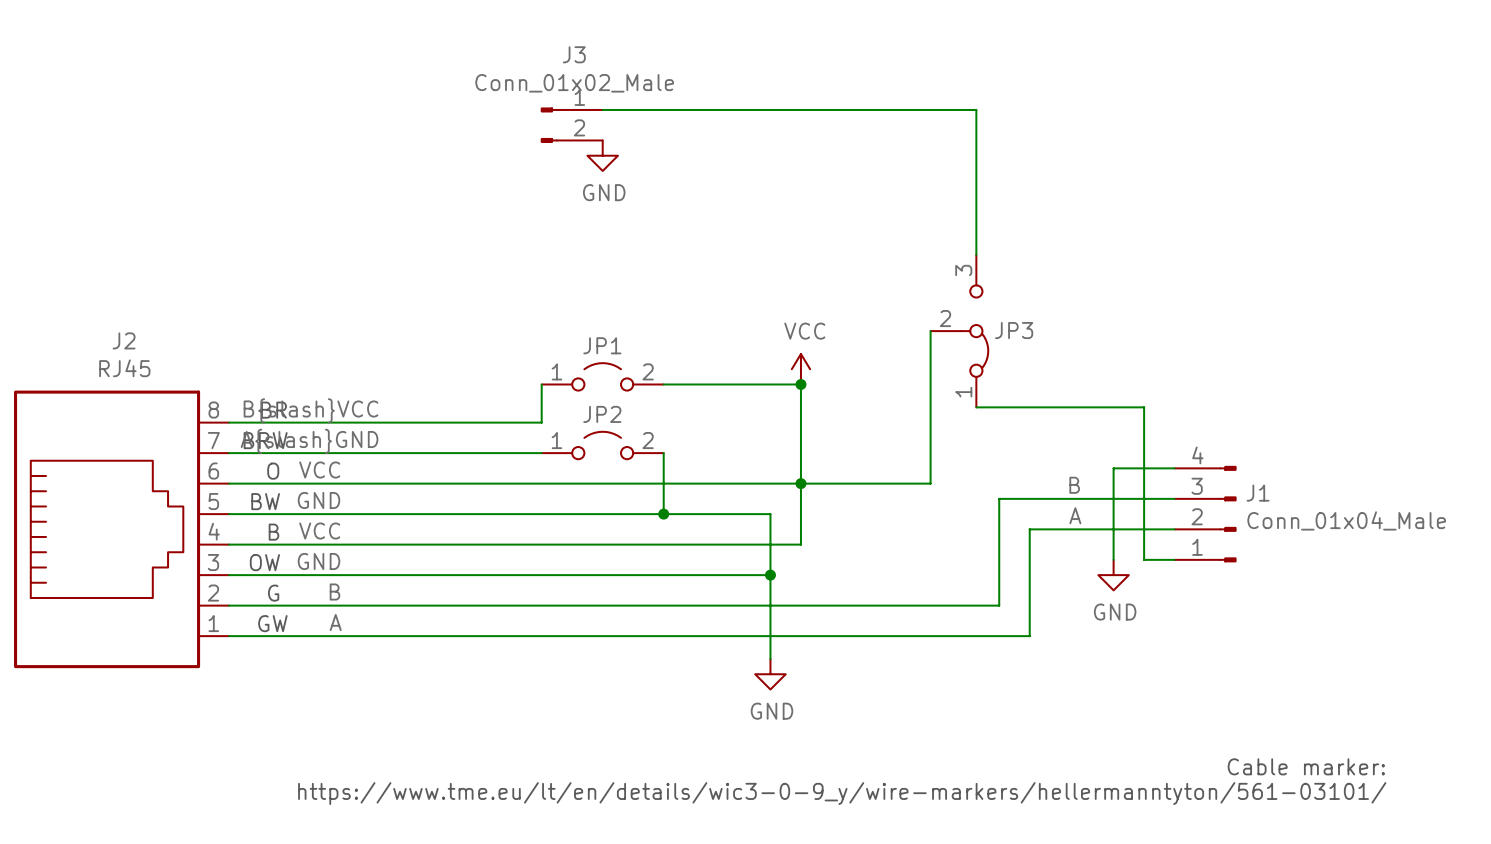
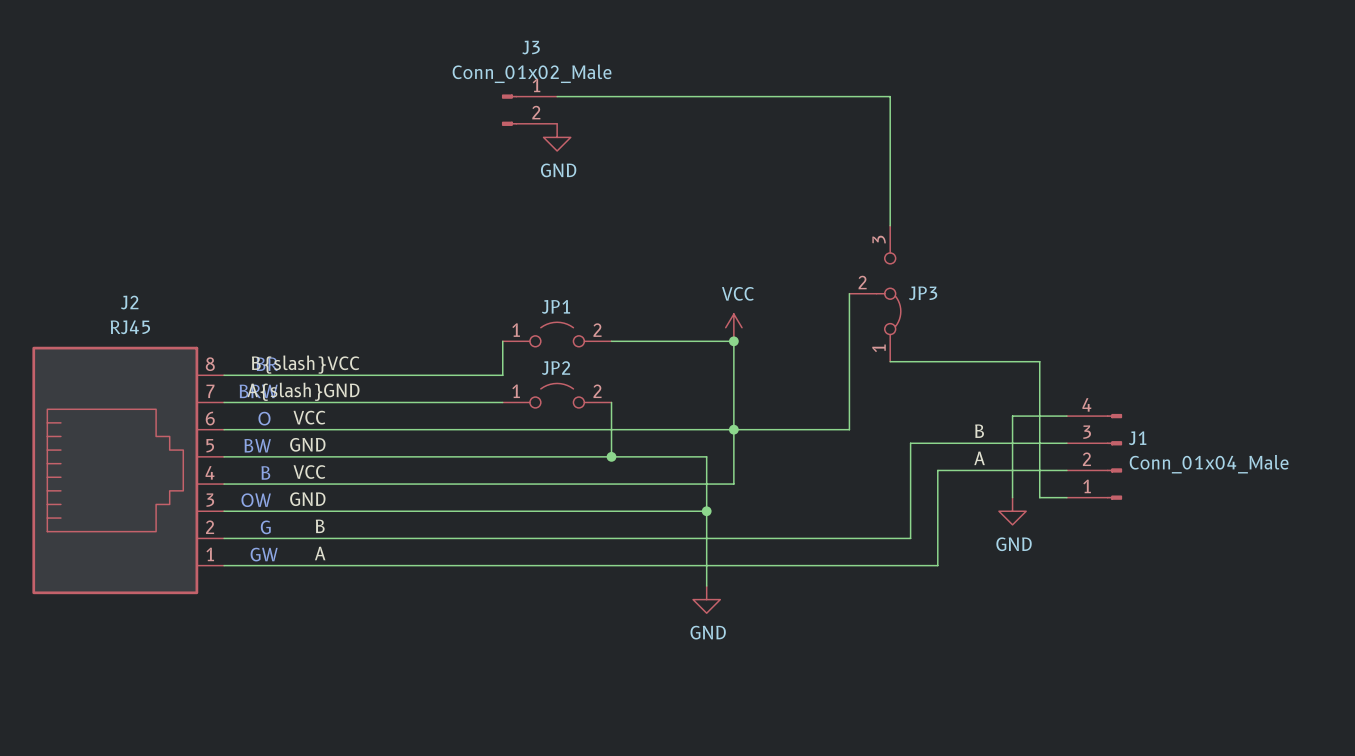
text: Cable marker: (1306, 766) -> none
text: https://www.tme.eu/lt/en/details/wic3-0-9_y/wire-markers/hellermanntyton/561-03101/ (842, 793) -> none

